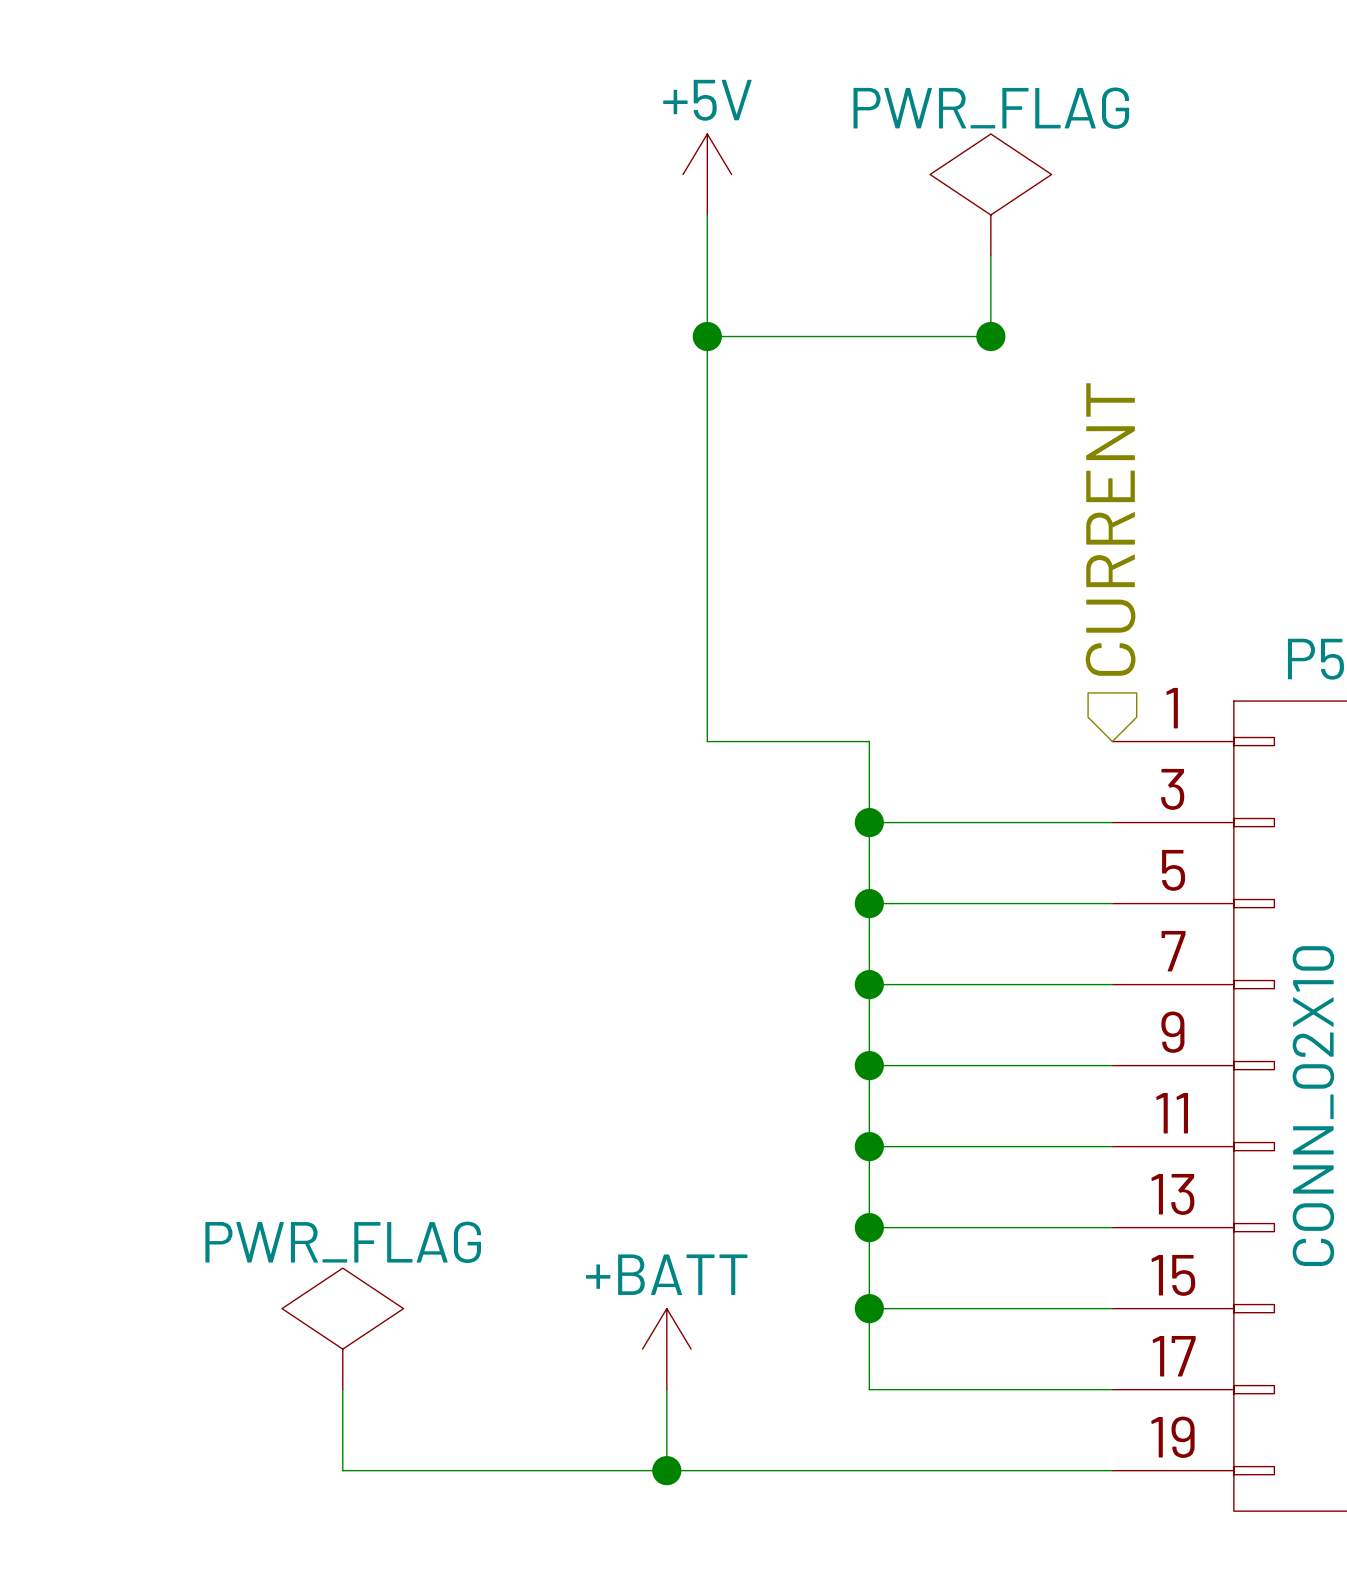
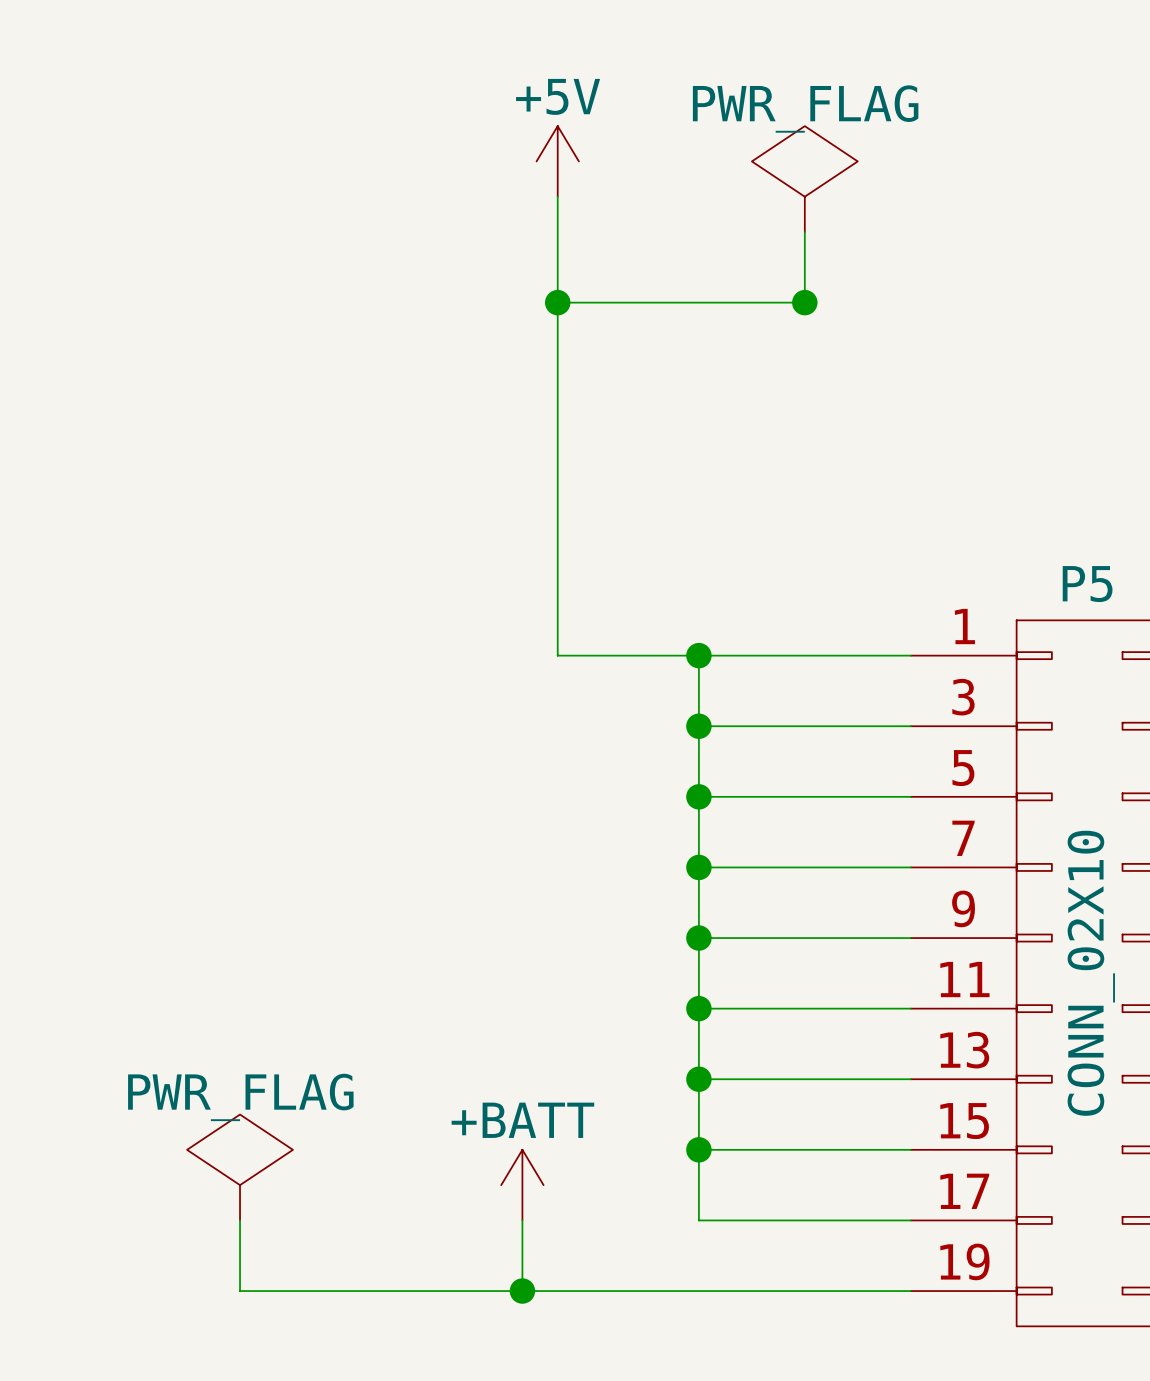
hierarchical label: CURRENT (1110, 529) -> none
wire: none -> (698, 655) (910, 655)
junction: none -> (698, 655)

